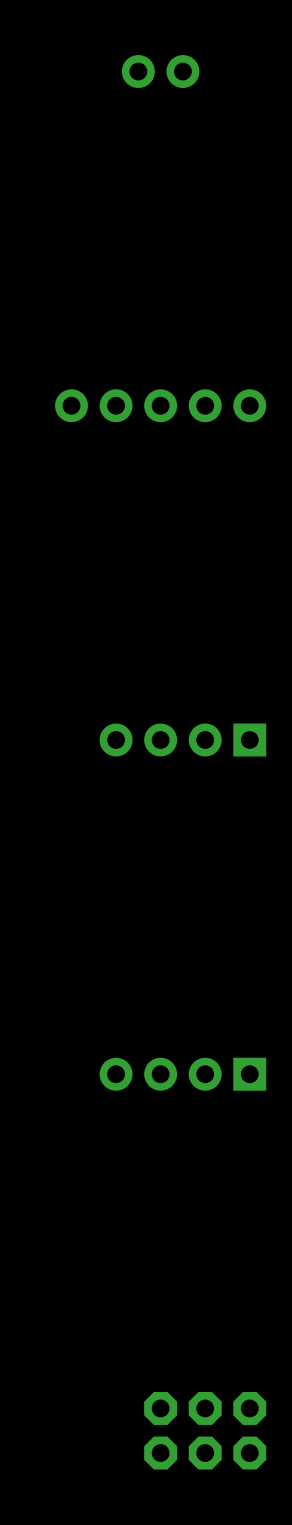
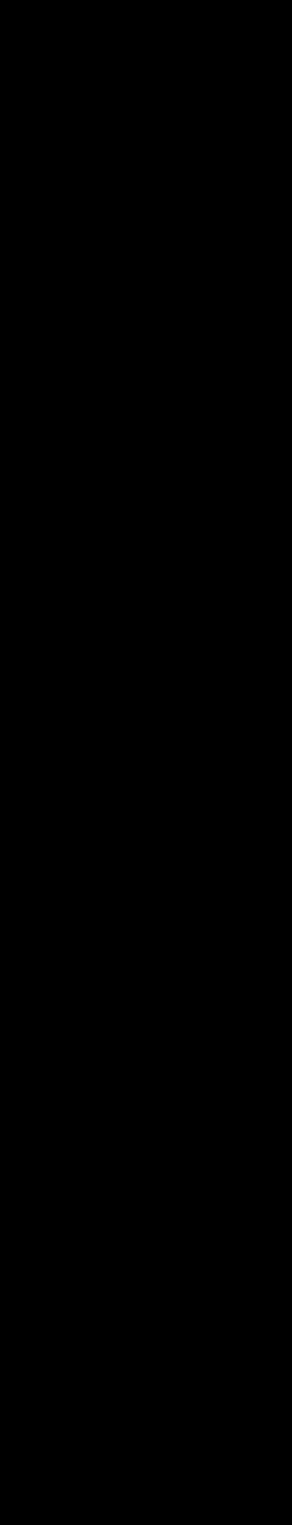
part: (160, 71) -> none
part: (160, 405) -> none
part: (182, 739) -> none
part: (182, 1074) -> none
part: (205, 1430) -> none

